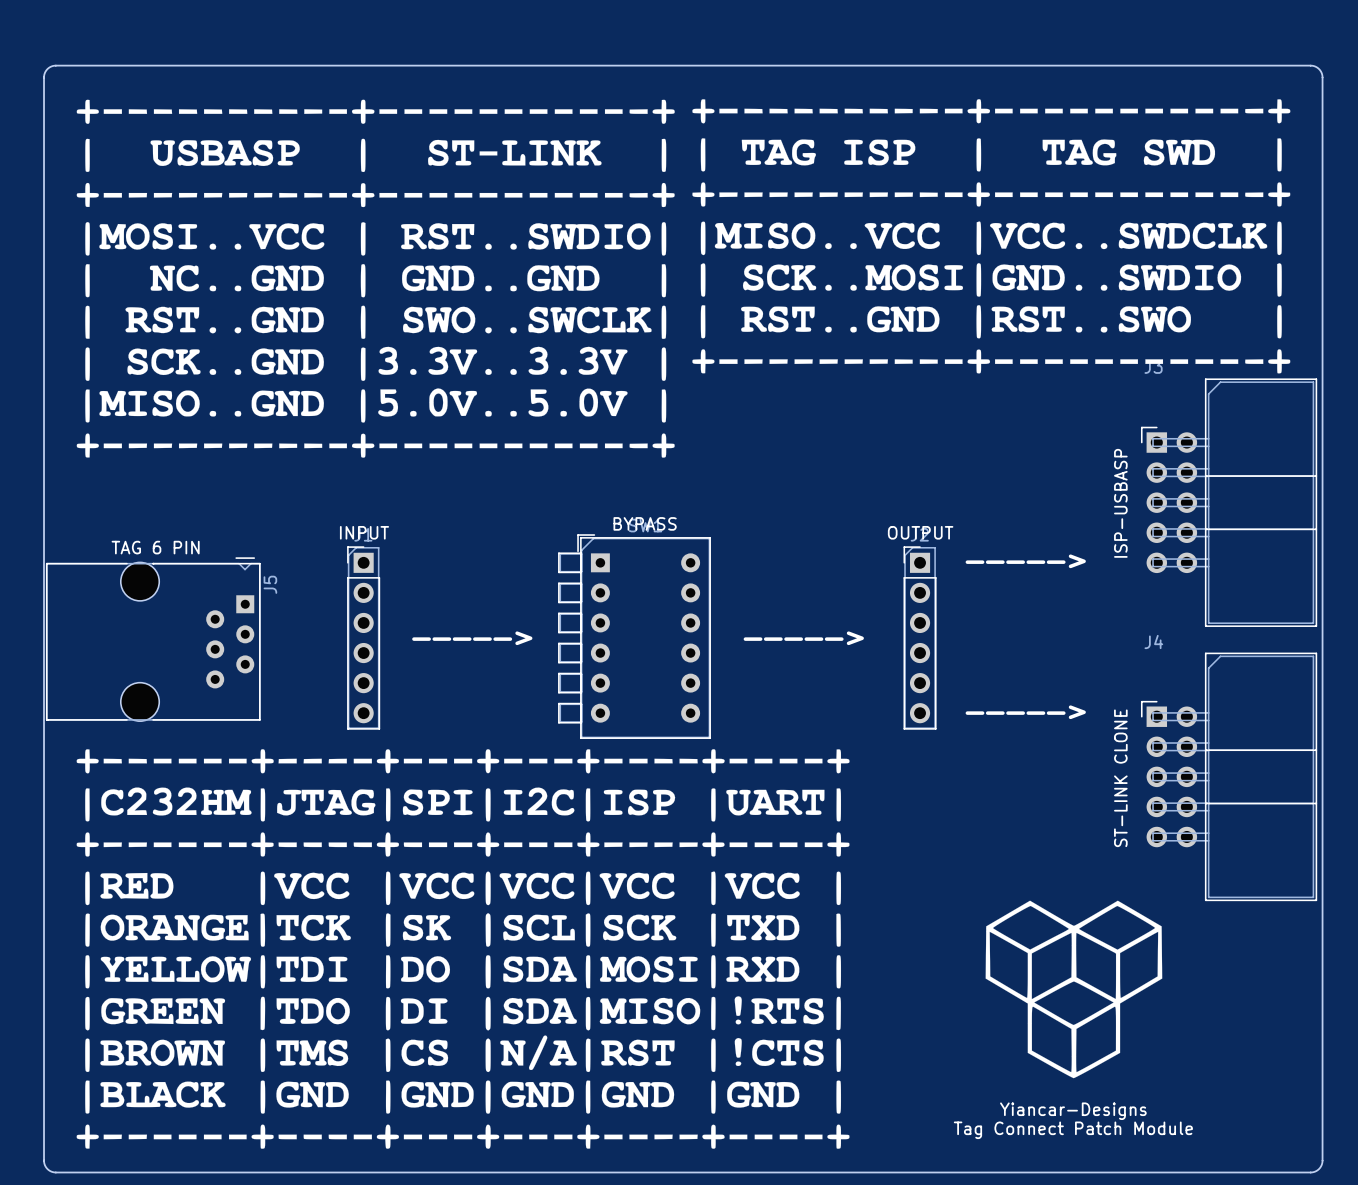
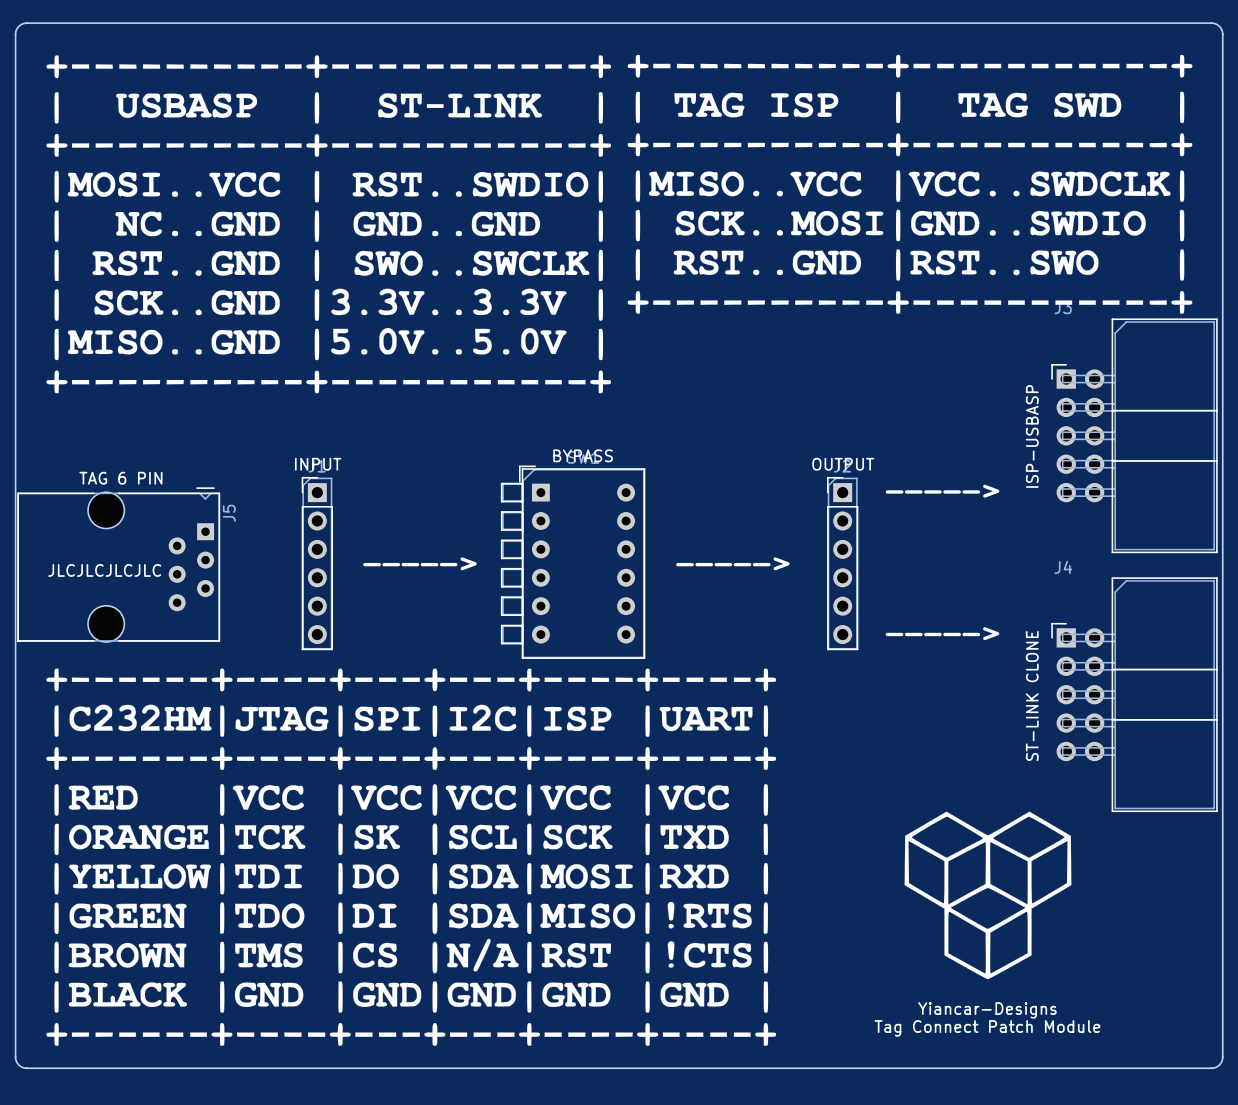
text: none -> JLCJLCJLCJLC (104, 570)

